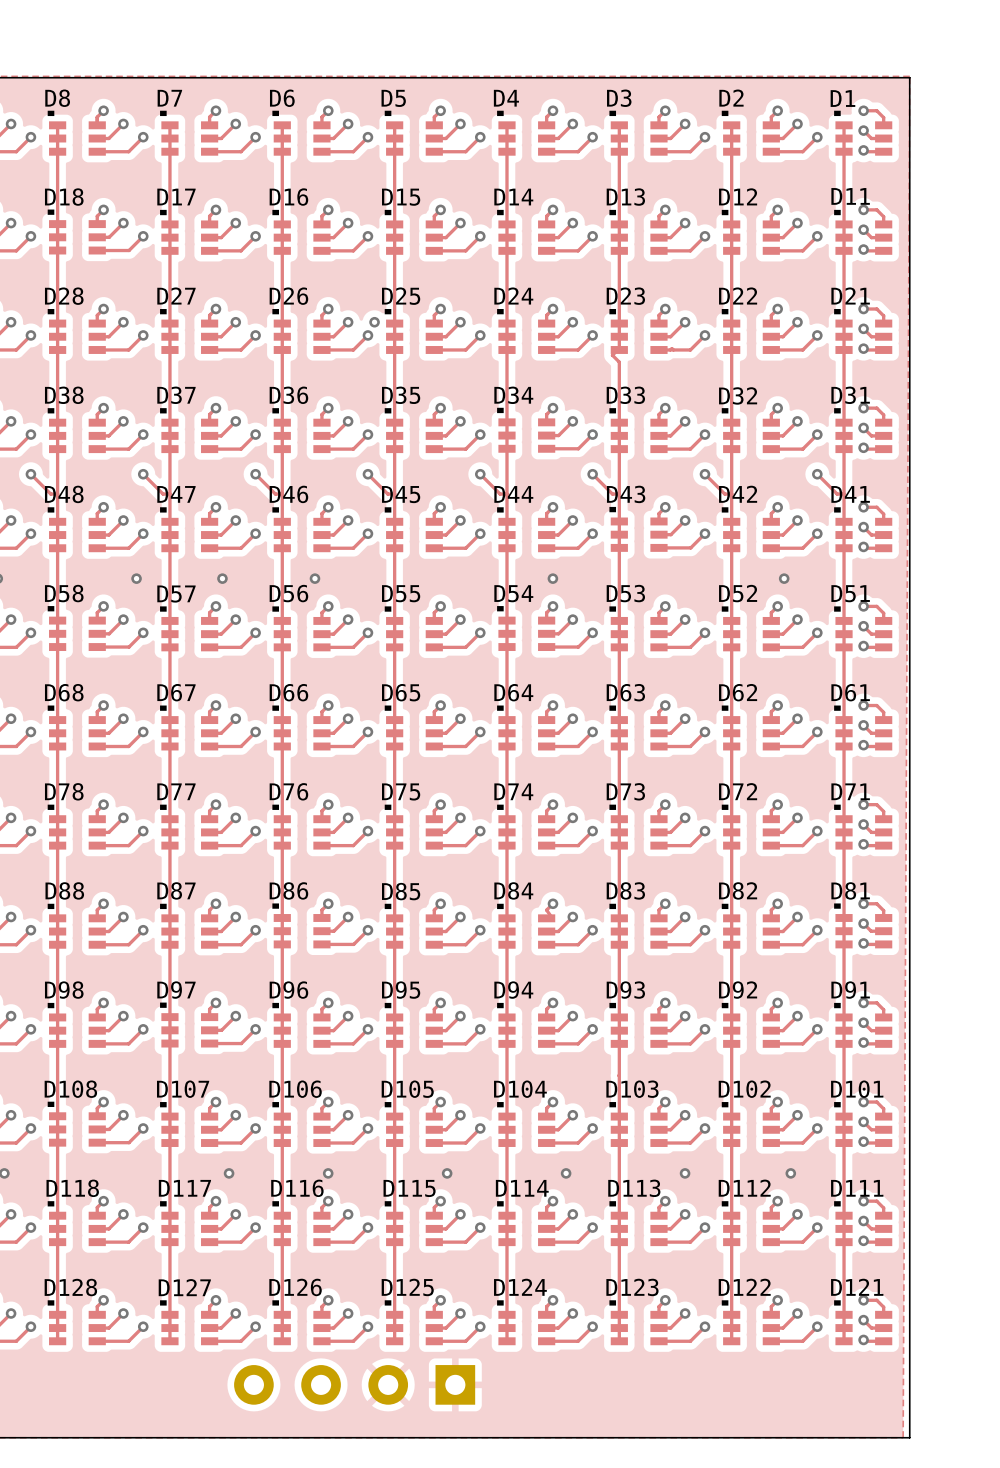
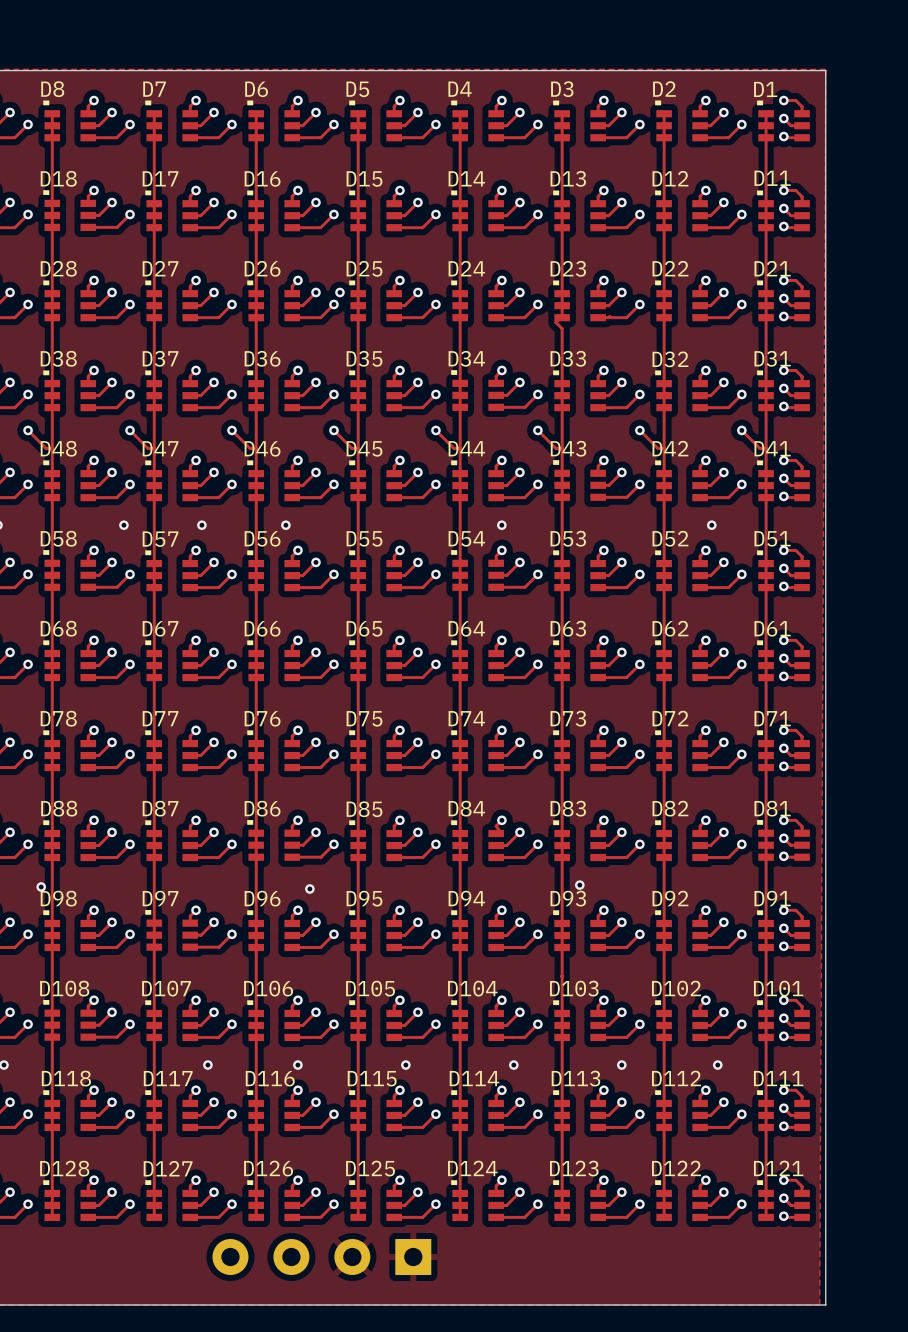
via: none -> (579, 885)
via: none -> (41, 886)
via: none -> (309, 889)

